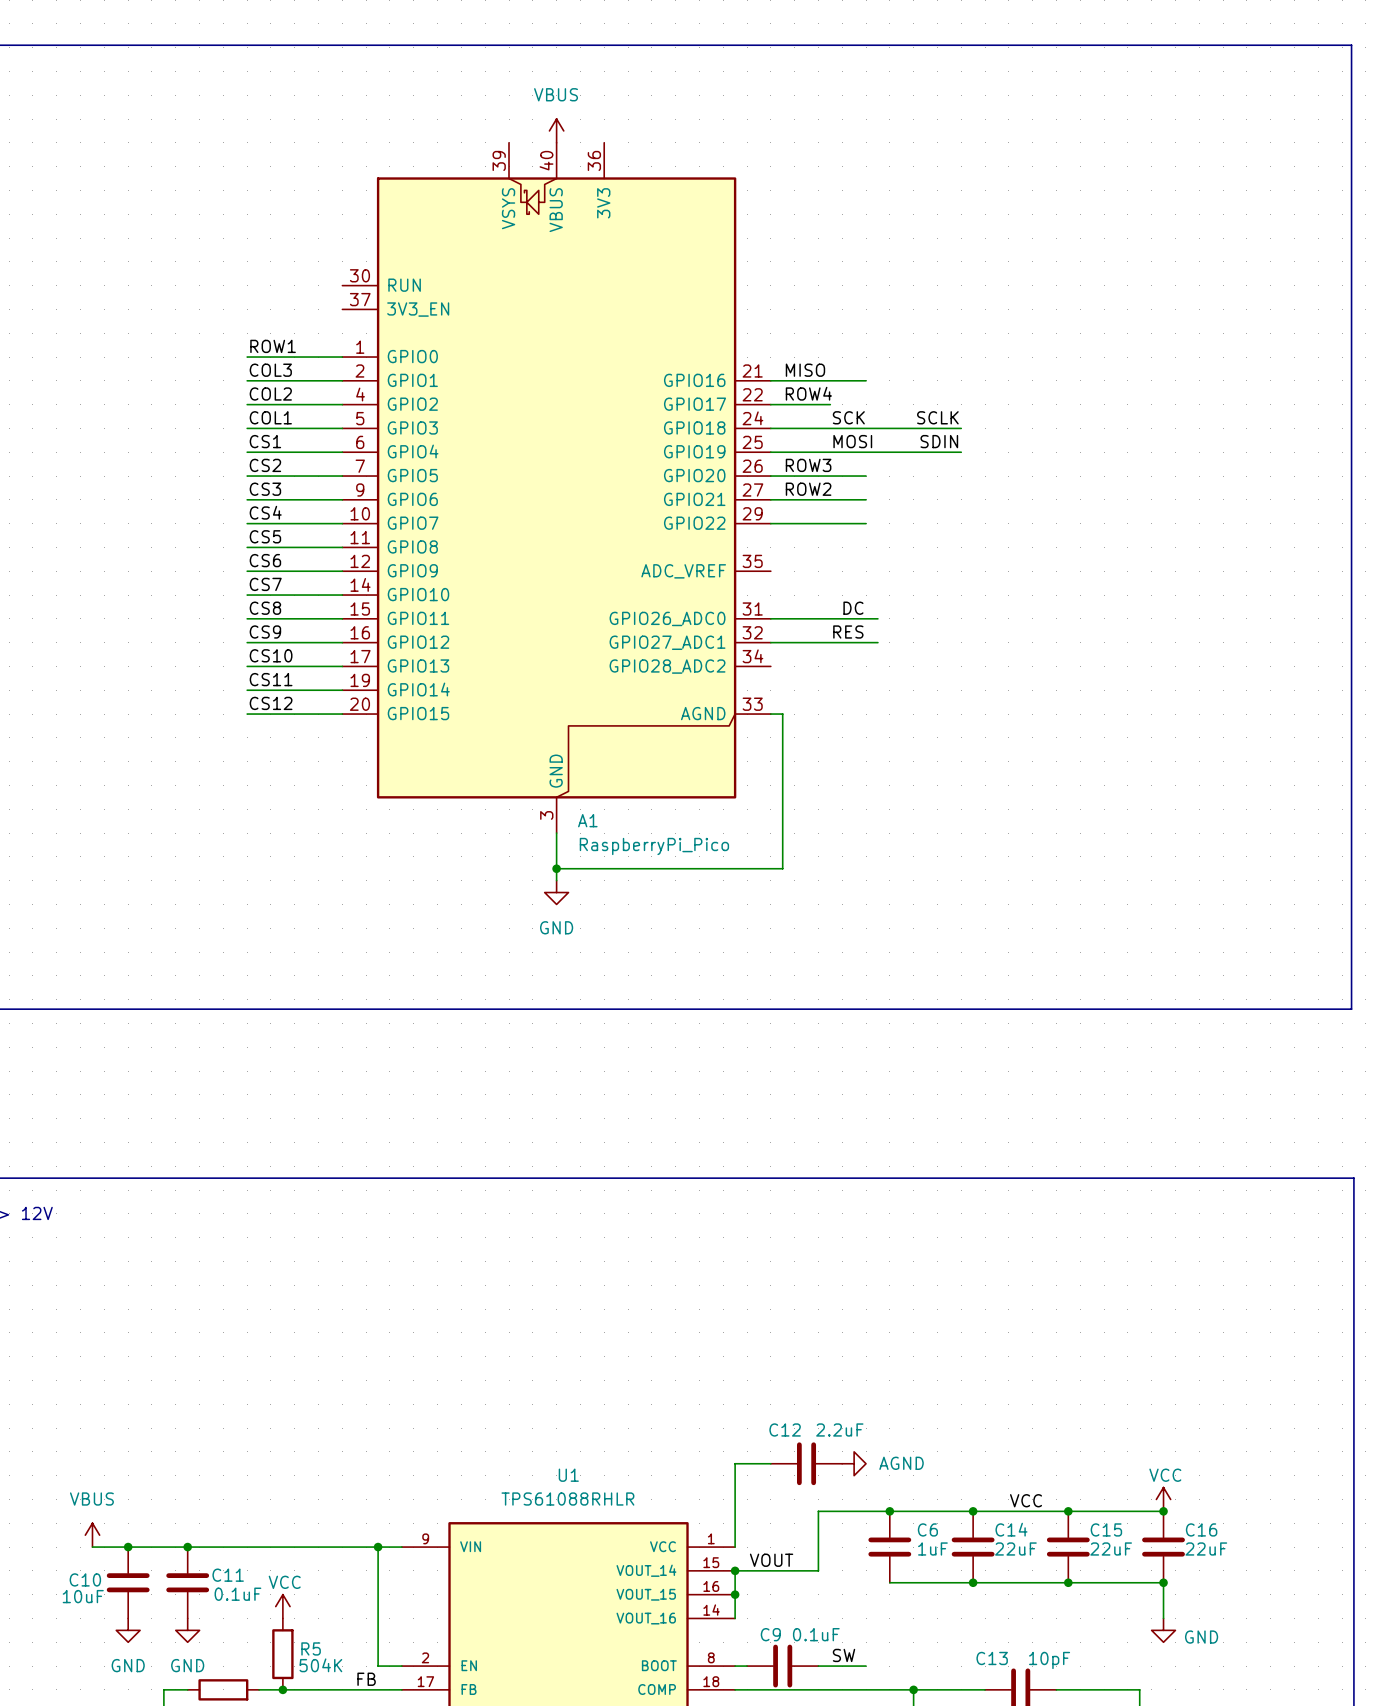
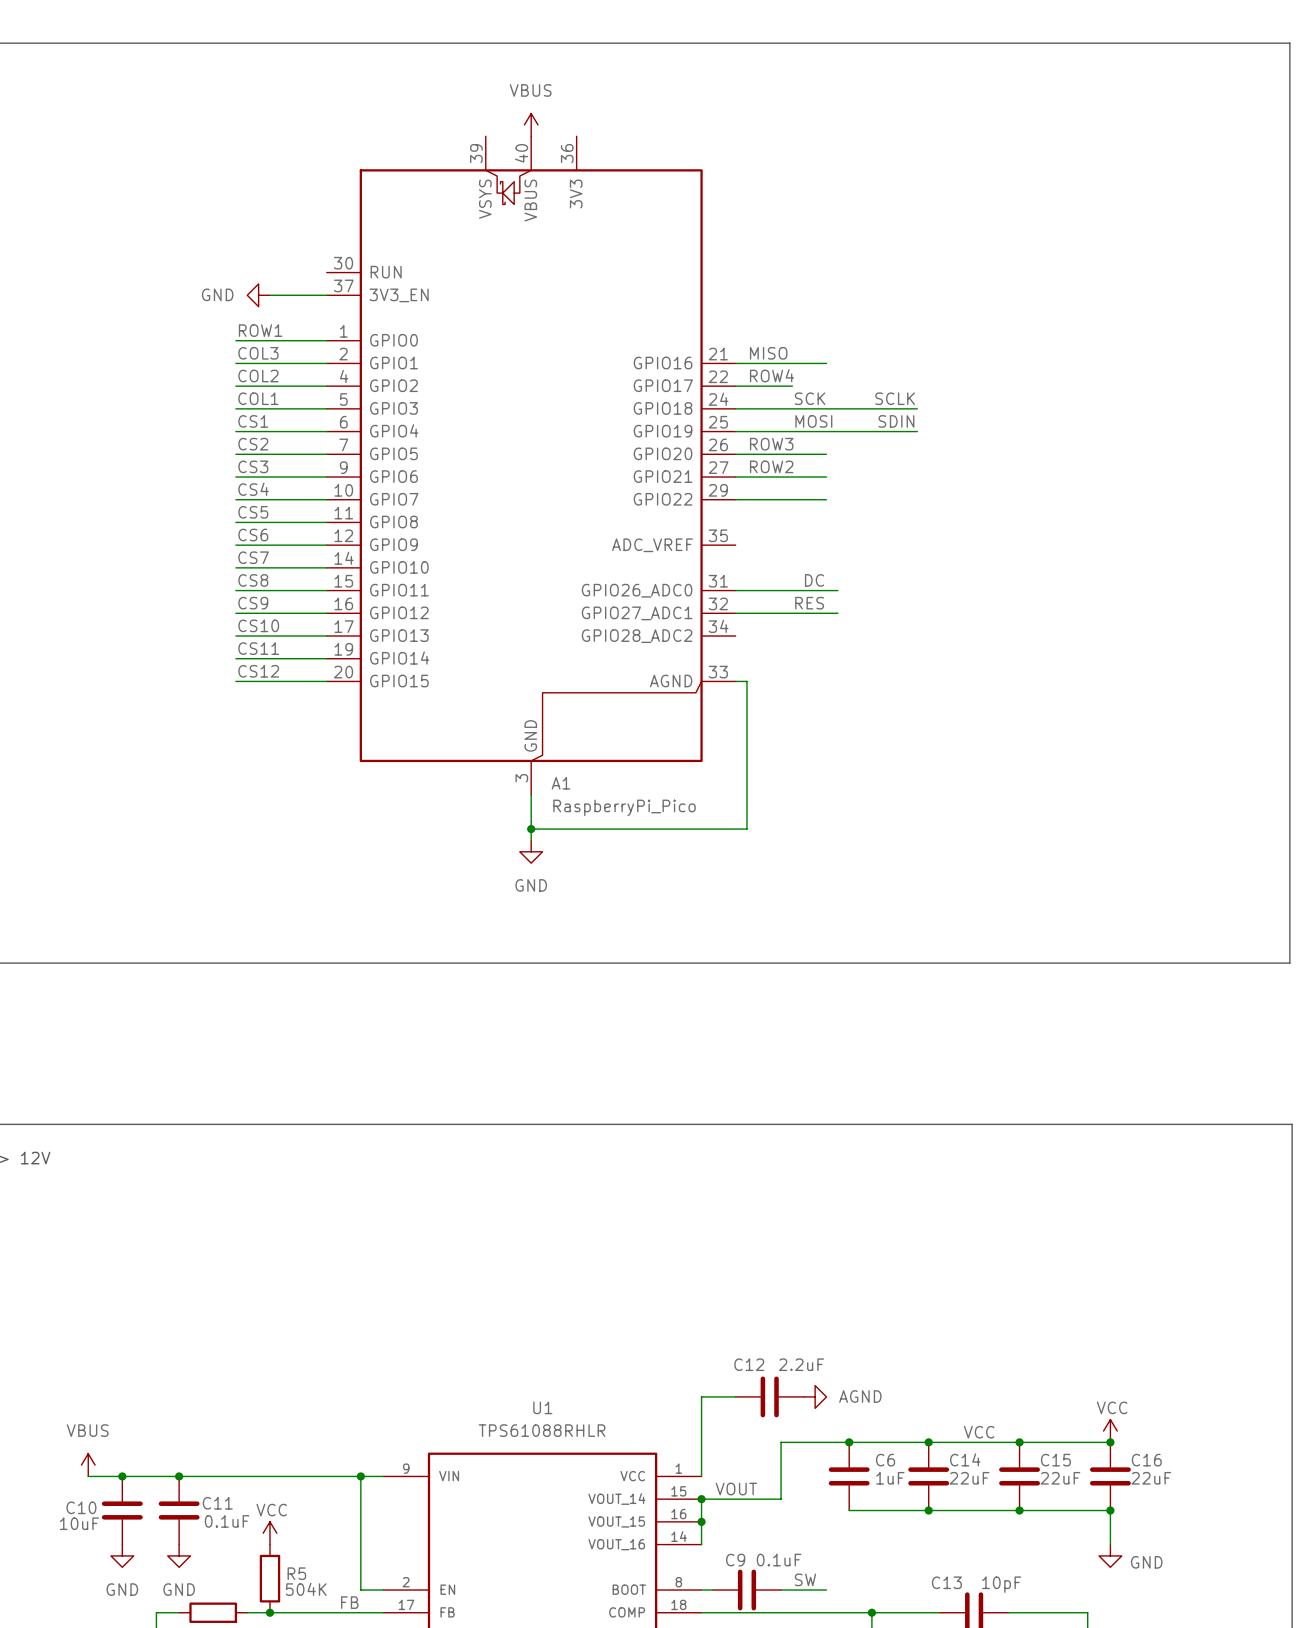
power symbol: none -> GND (258, 295)
wire: none -> (269, 295) (326, 295)

